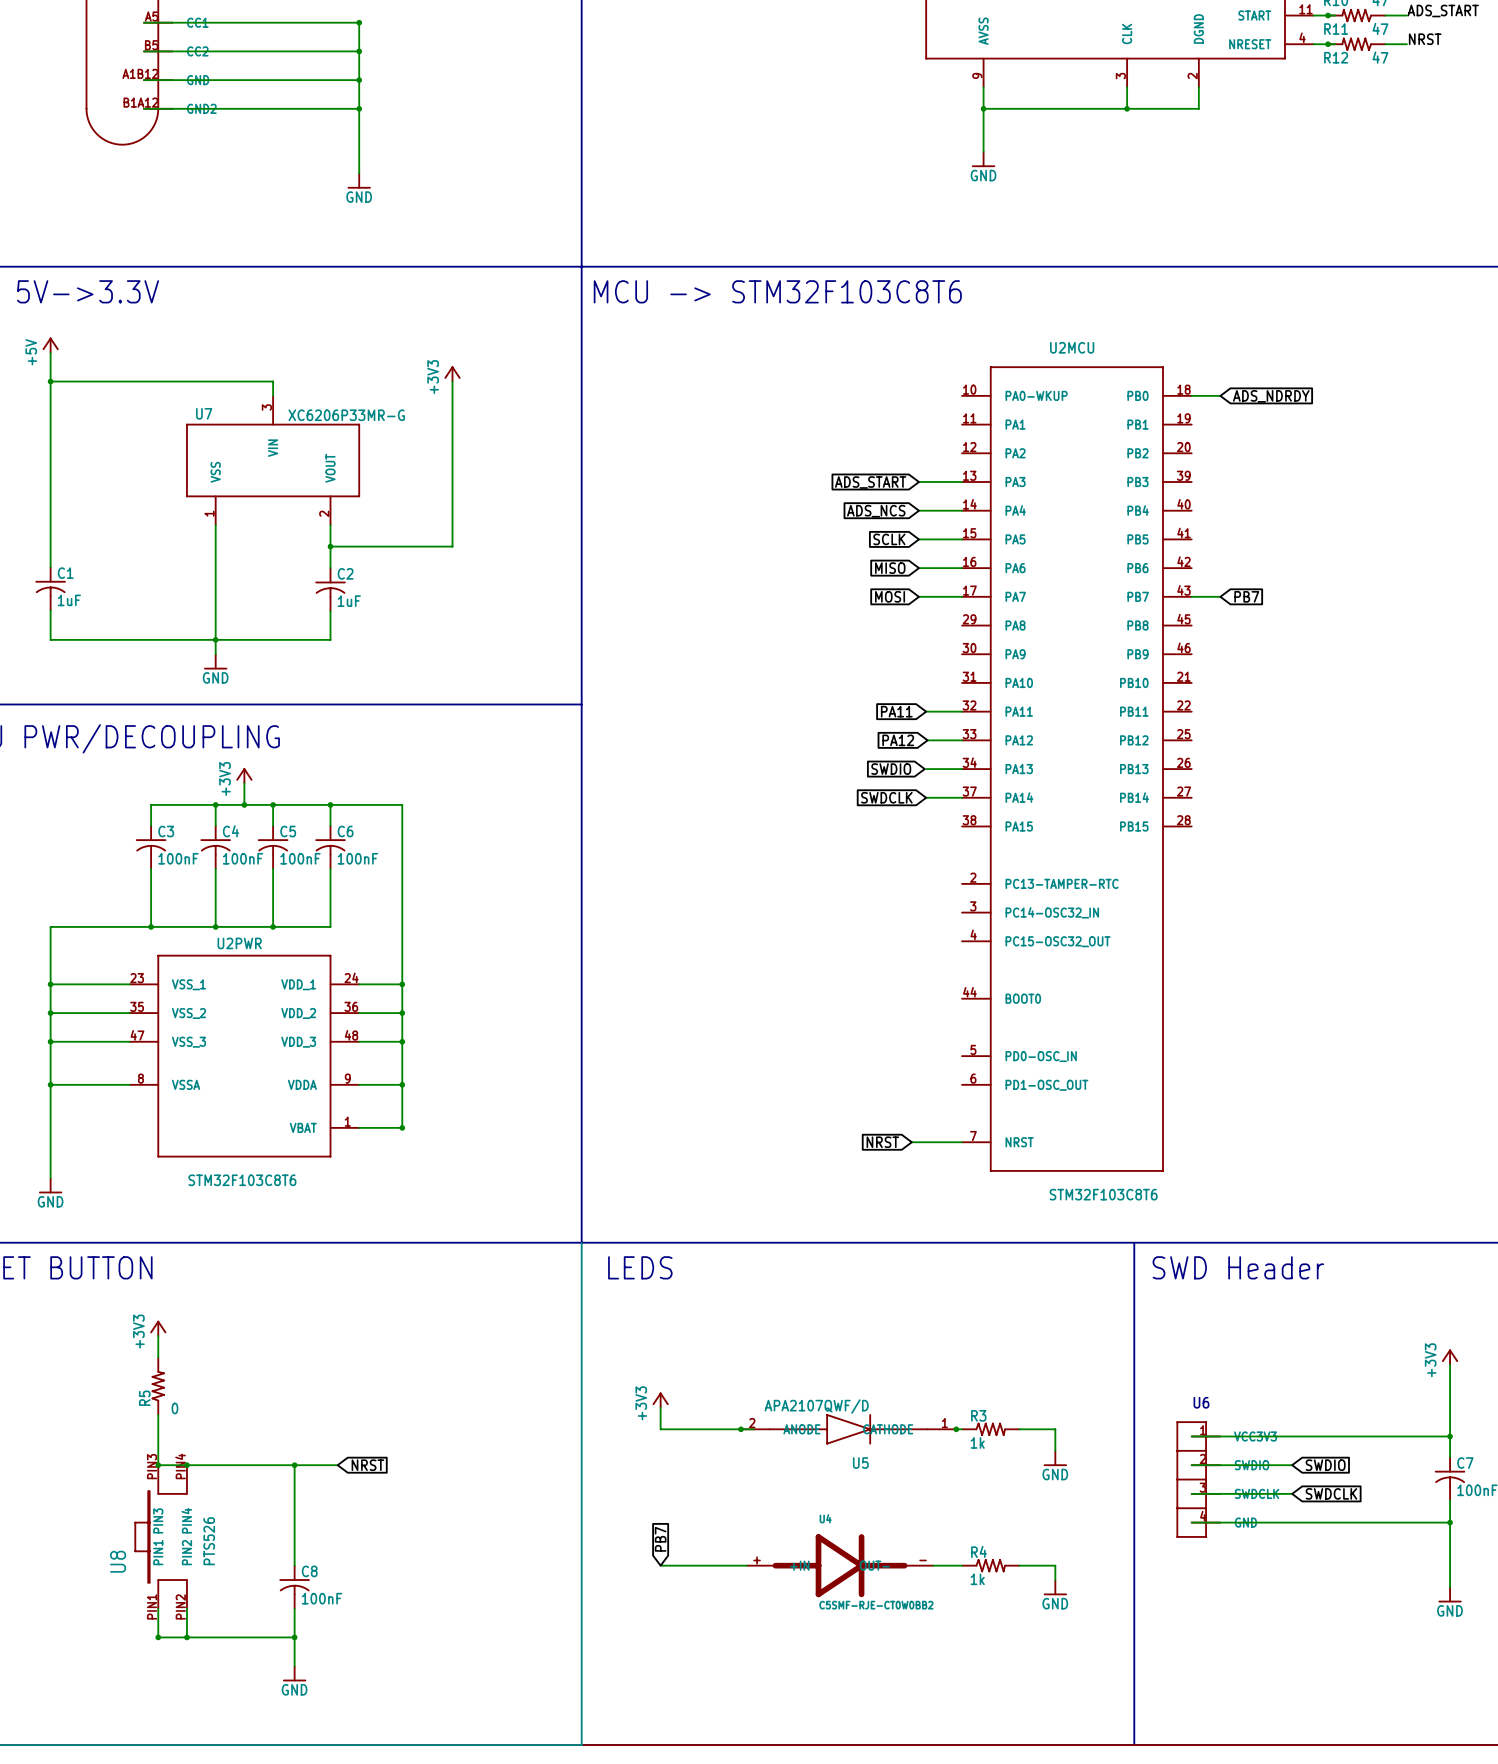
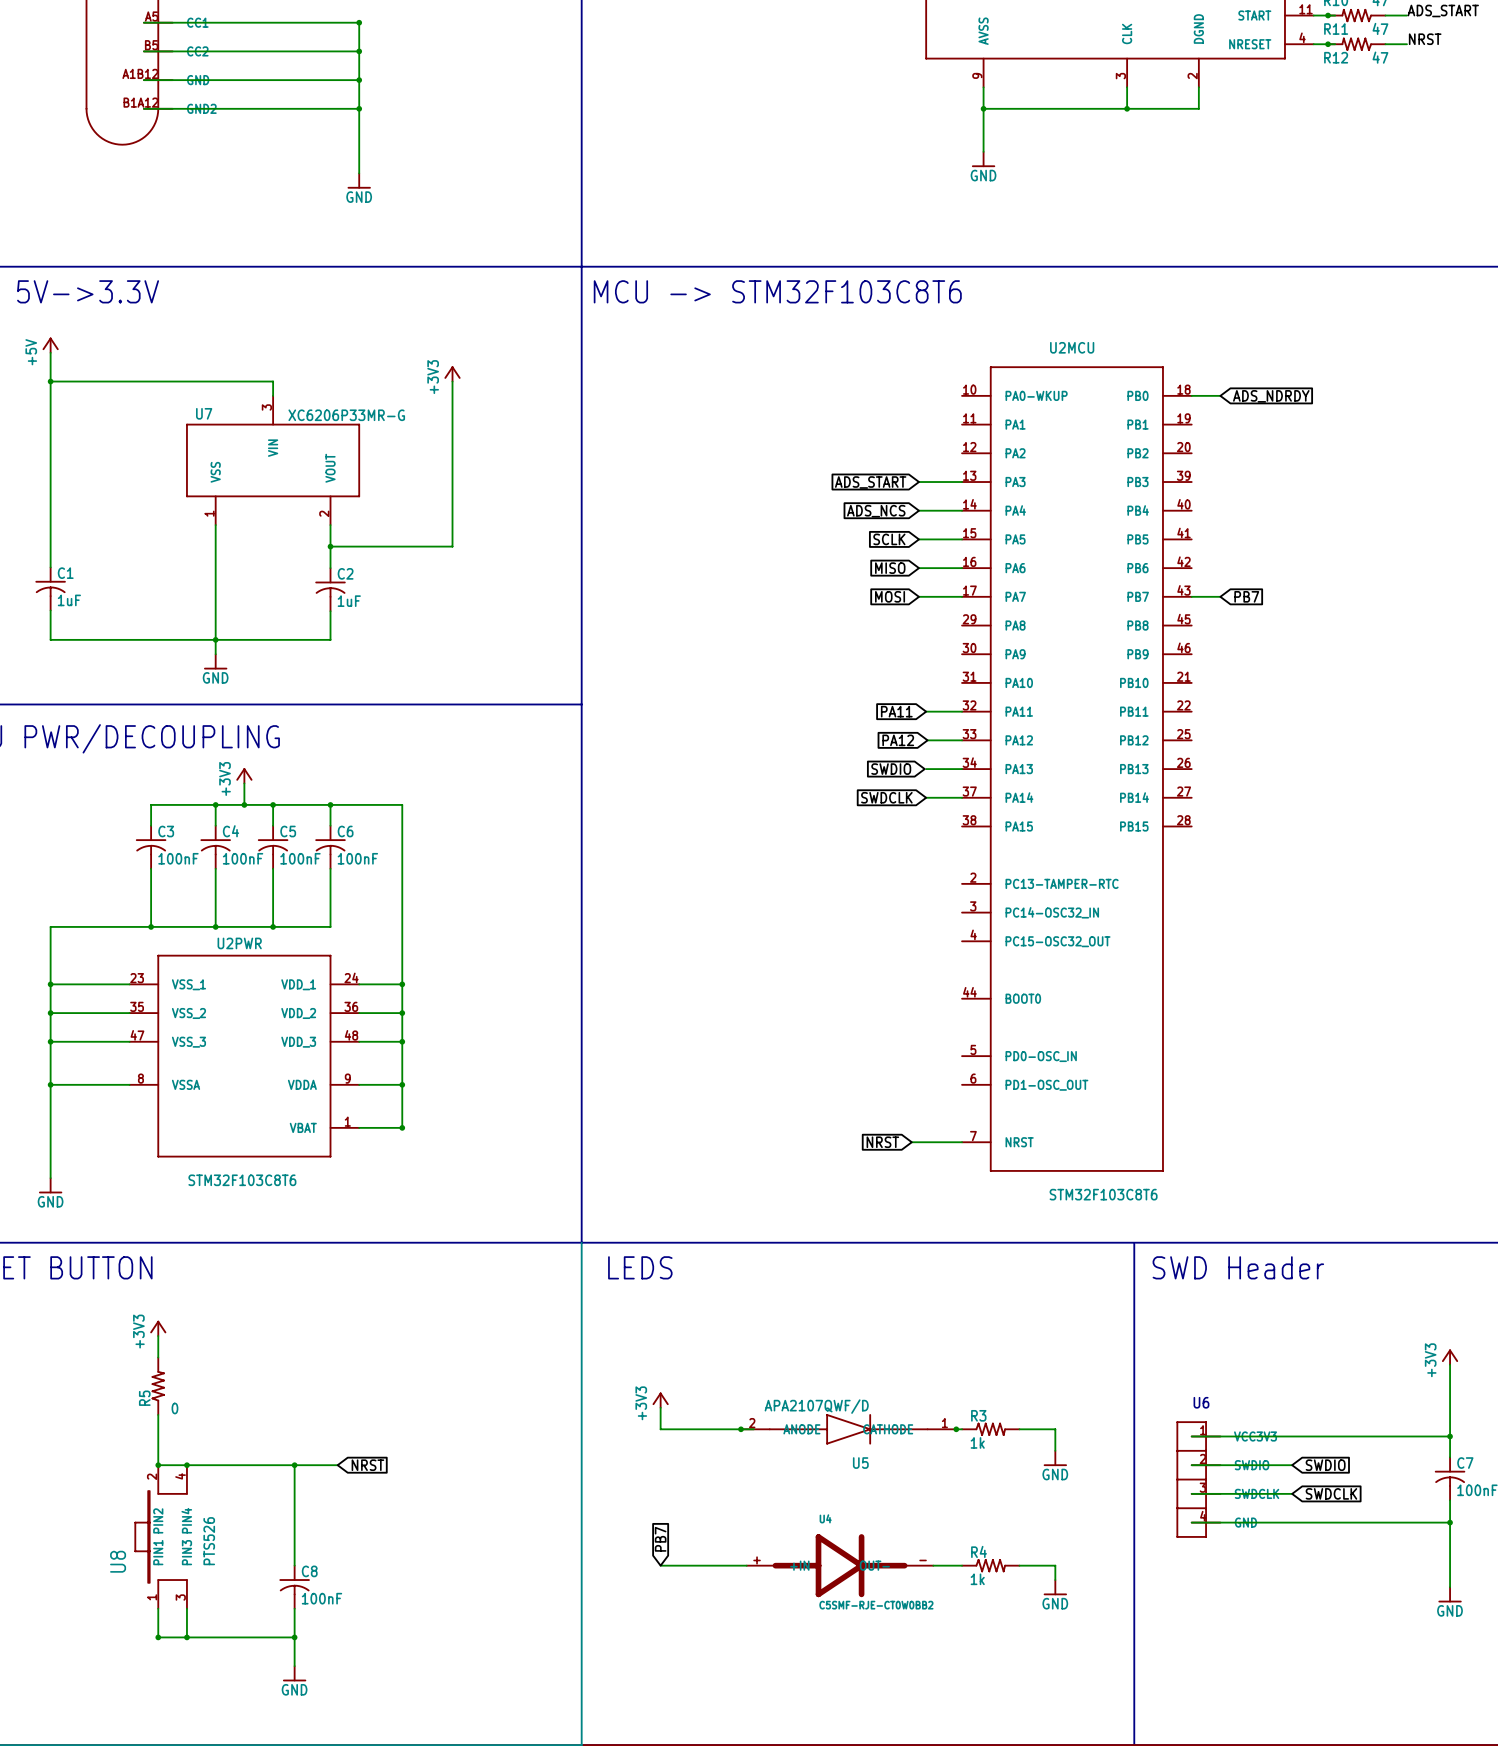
U8 pin number: PIN3 (152, 1466) -> 2 (152, 1476)
U8 pin number: PIN4 (180, 1466) -> 4 (180, 1476)
U8 pin name: PIN3 (158, 1520) -> PIN2 (158, 1520)
U8 pin name: PIN2 (186, 1552) -> PIN3 (186, 1552)
U8 pin number: PIN1 (152, 1606) -> 1 (152, 1597)
U8 pin number: PIN2 (180, 1606) -> 3 (180, 1597)

